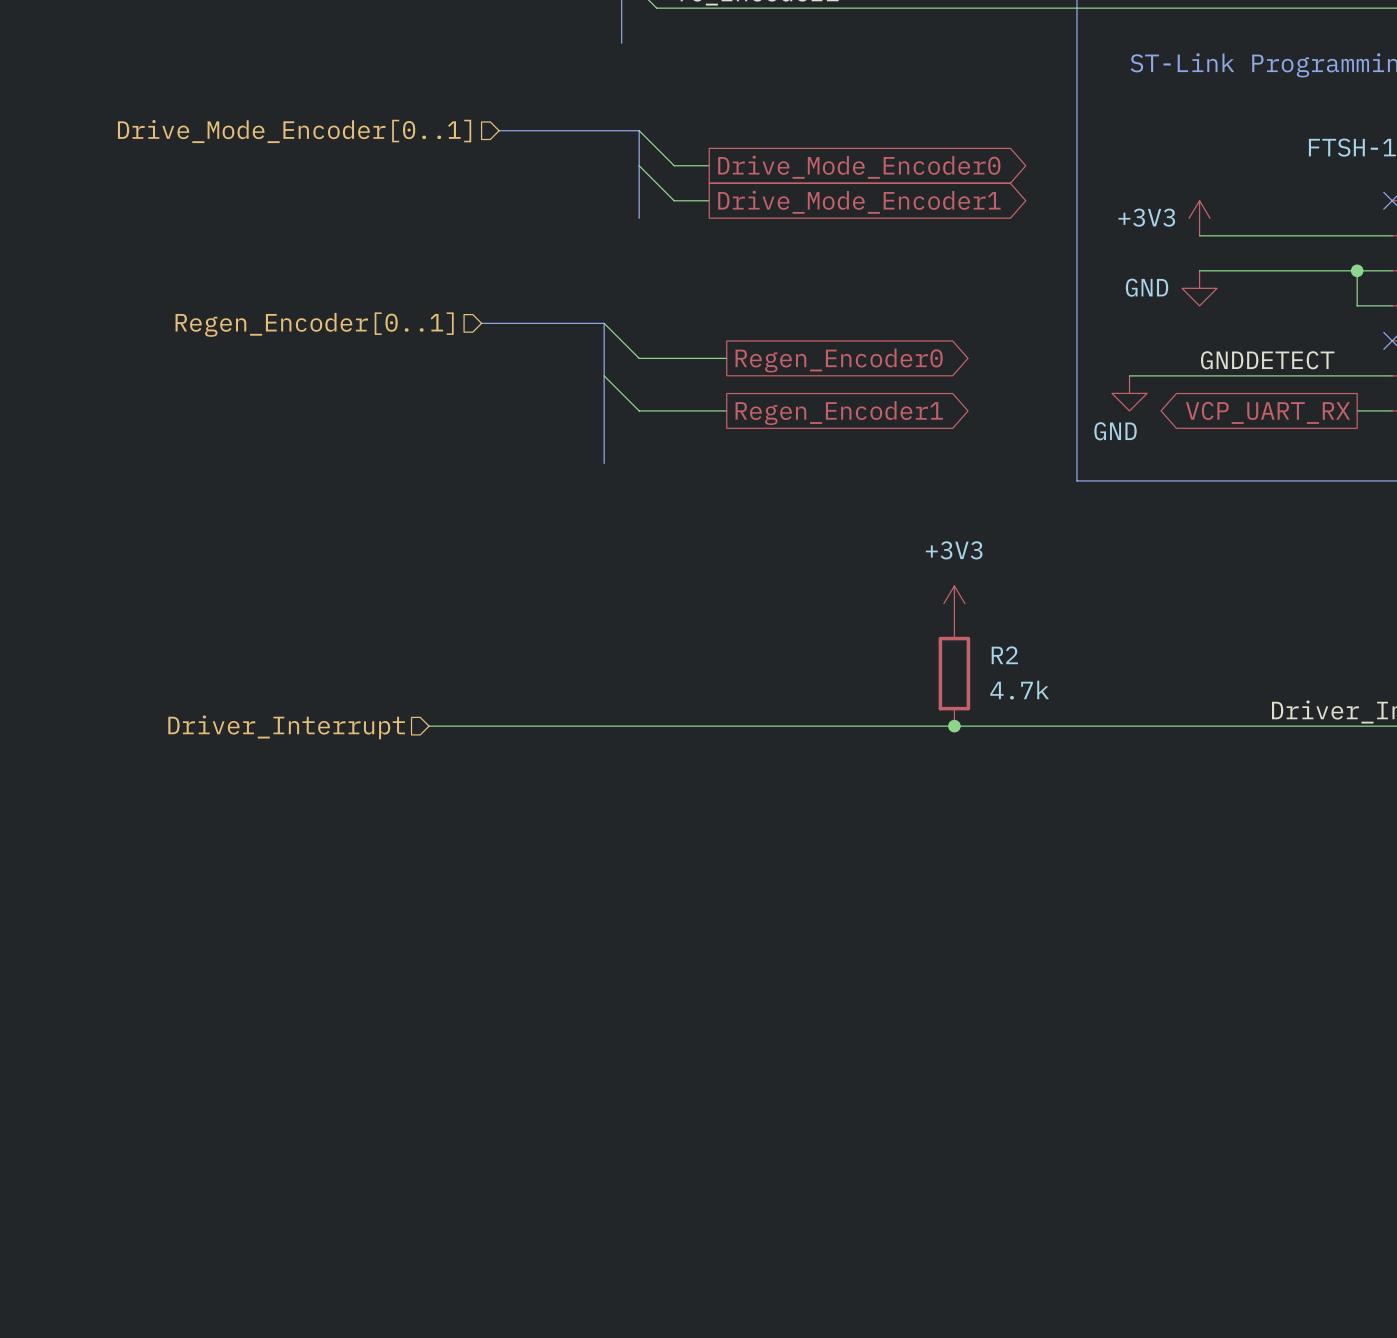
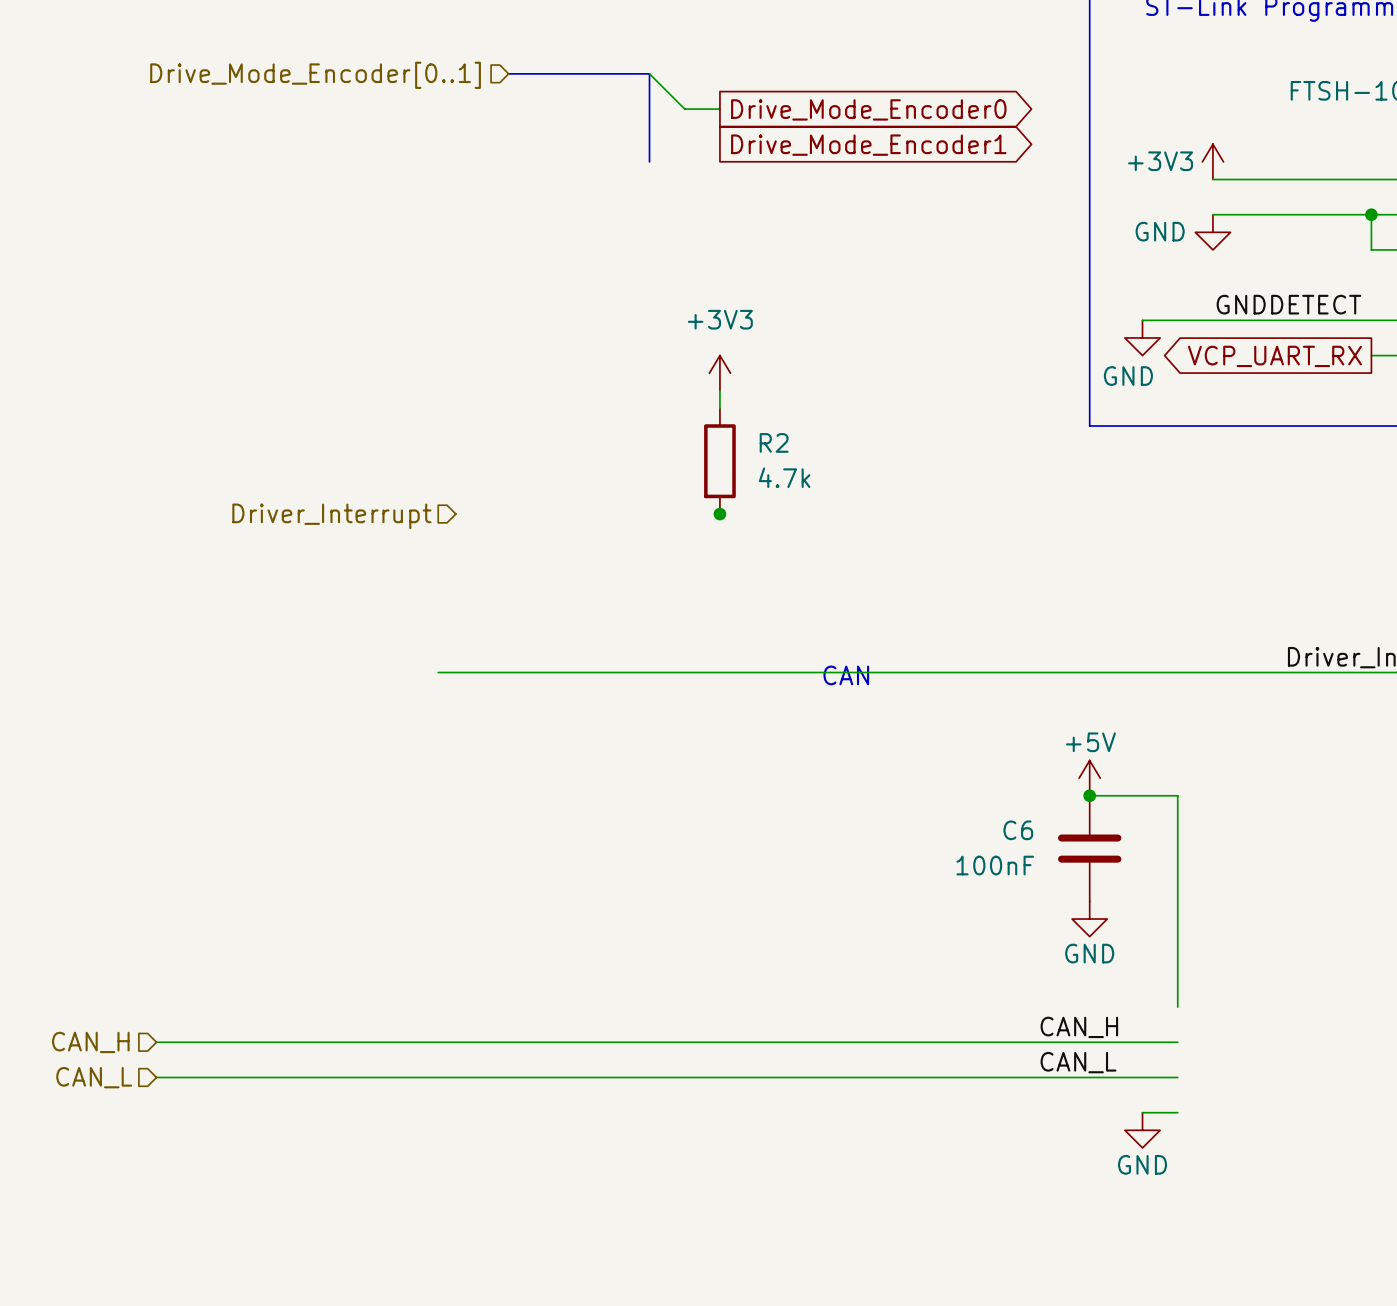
wire: (639, 165) (674, 200) (709, 200) -> none
bus: (481, 323) (604, 323) (604, 463) -> none
wire: (604, 323) (639, 358) (726, 358) -> none
hierarchical label: Regen_Encoder[0..1] (314, 324) -> none
global label: Regen_Encoder0 (839, 360) -> none
wire: (604, 375) (639, 410) (726, 410) -> none
global label: Regen_Encoder1 (839, 413) -> none
wire: none -> (719, 390) (719, 408)
junction: none -> (719, 514)
power symbol position: +3V3 (954, 603) -> +3V3 (719, 373)
R2 position: (954, 673) -> (719, 461)
junction: (954, 726) -> none
hierarchical label position: Driver_Interrupt (286, 727) -> Driver_Interrupt (331, 516)
text: none -> CAN (846, 675)
power symbol: none -> +5V (1089, 778)
wire: none -> (1089, 795) (1177, 795) (1177, 1007)
junction: none -> (1089, 795)
C6: none -> 100nF (1089, 848)
power symbol: none -> GND (1089, 919)
label: none -> CAN_H (1079, 1027)
wire: none -> (156, 1042) (1177, 1042)
hierarchical label: none -> CAN_H (90, 1042)
label: none -> CAN_L (1078, 1062)
wire: none -> (156, 1077) (1177, 1077)
hierarchical label: none -> CAN_L (94, 1077)
wire: none -> (1142, 1112) (1177, 1112)
power symbol: none -> GND (1142, 1130)

